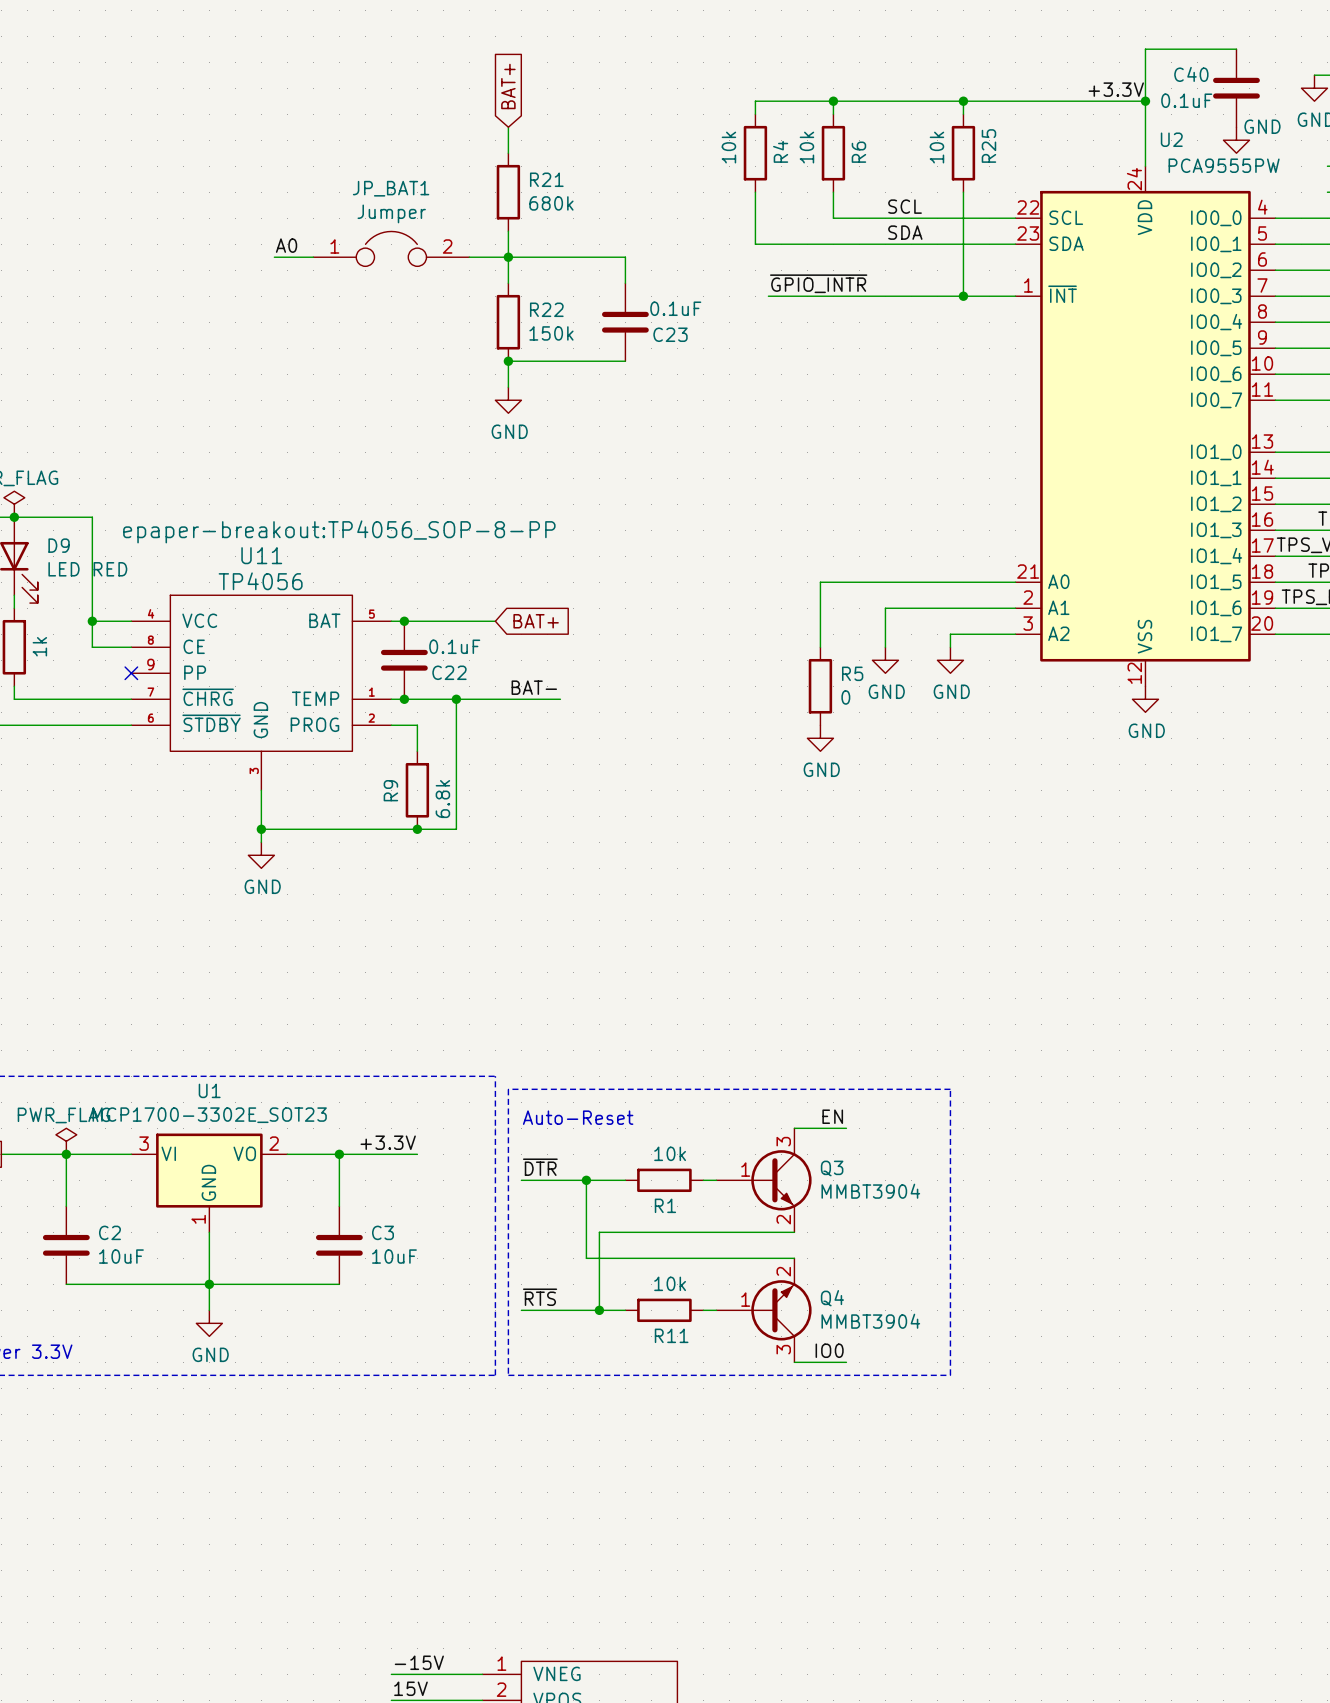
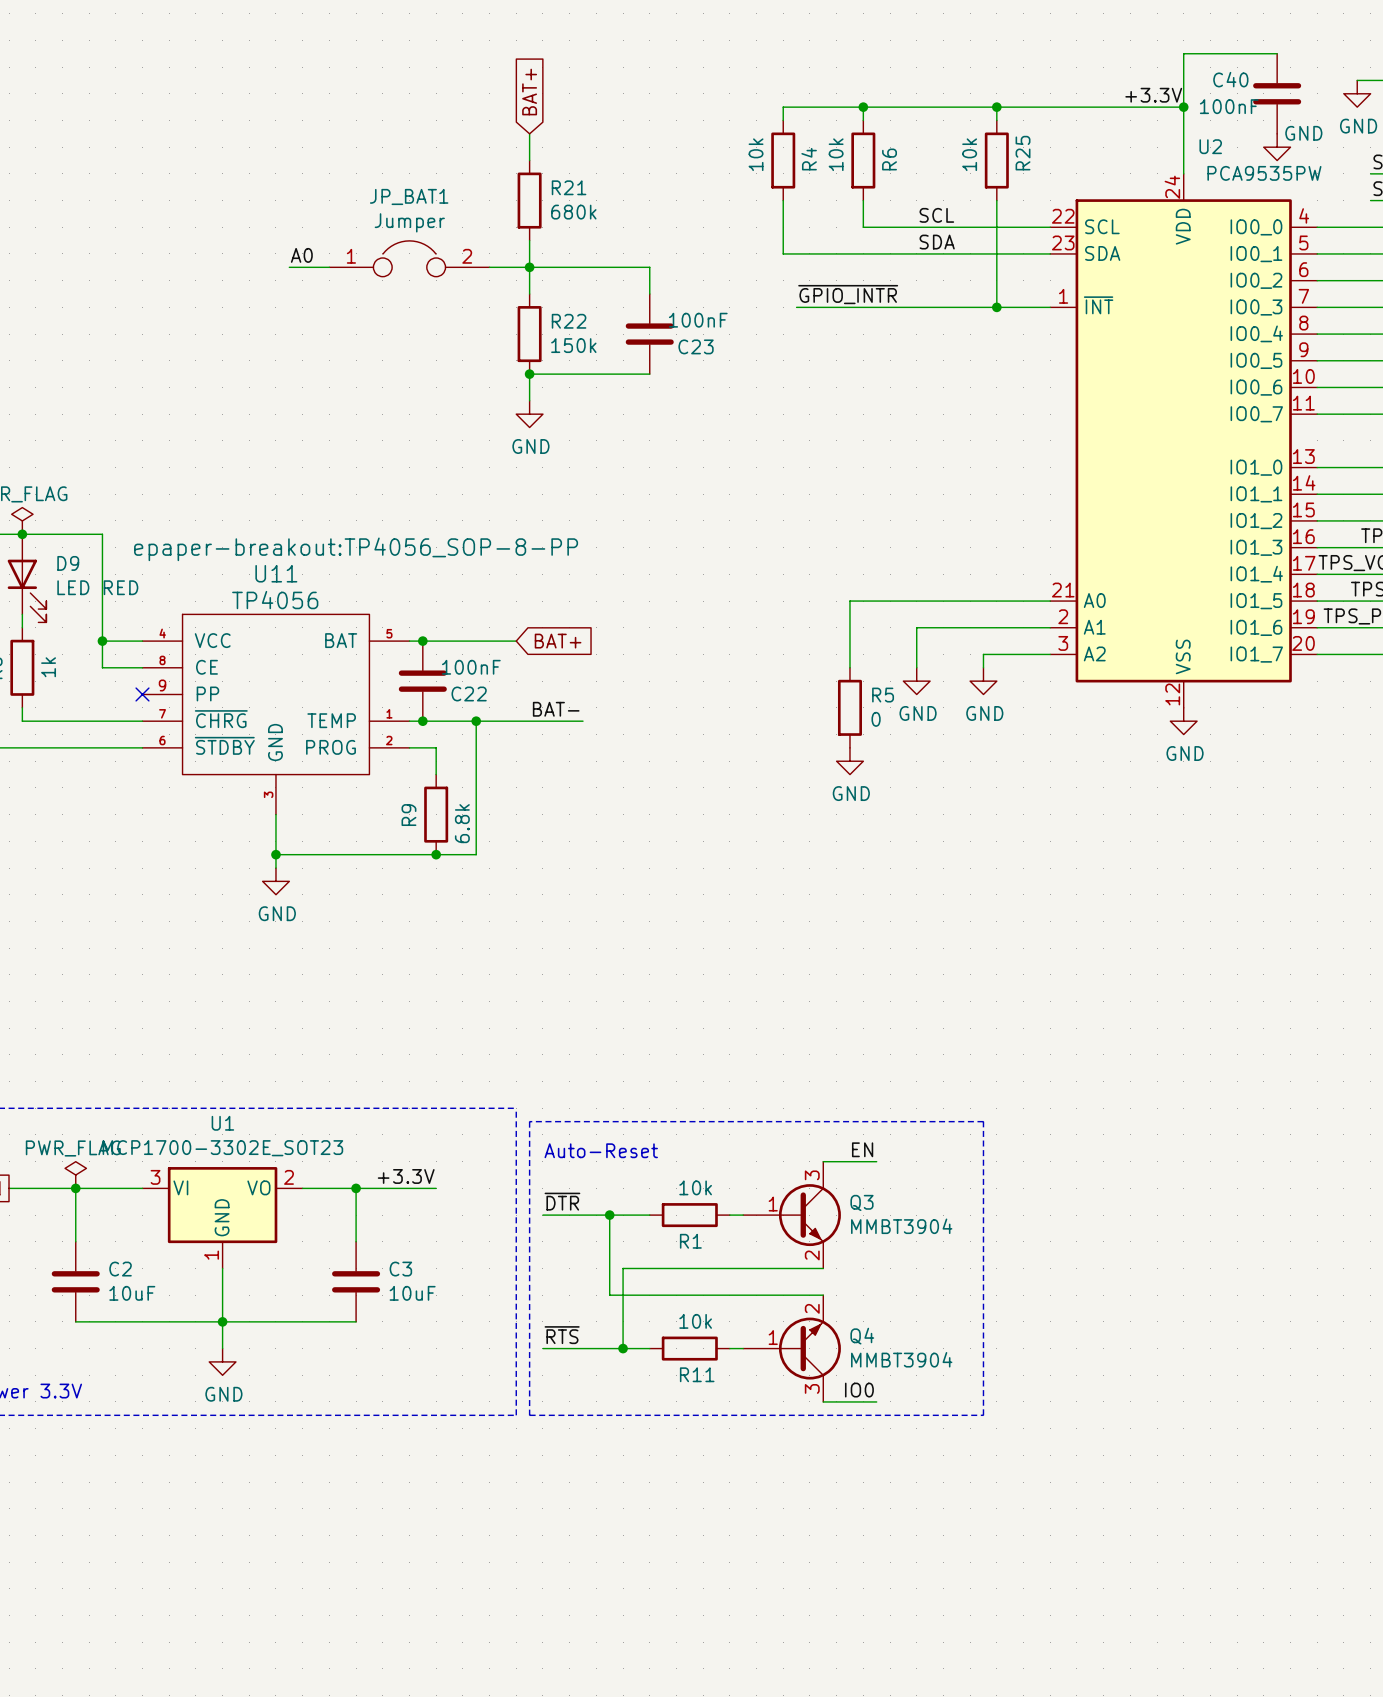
C40 value: 0.1uF (1186, 100) -> 100nF (1229, 106)
U2 value: PCA9555PW (1224, 165) -> PCA9535PW (1264, 173)
C23 value: 0.1uF (675, 308) -> 100nF (698, 320)
C22 value: 0.1uF (454, 646) -> 100nF (471, 667)

